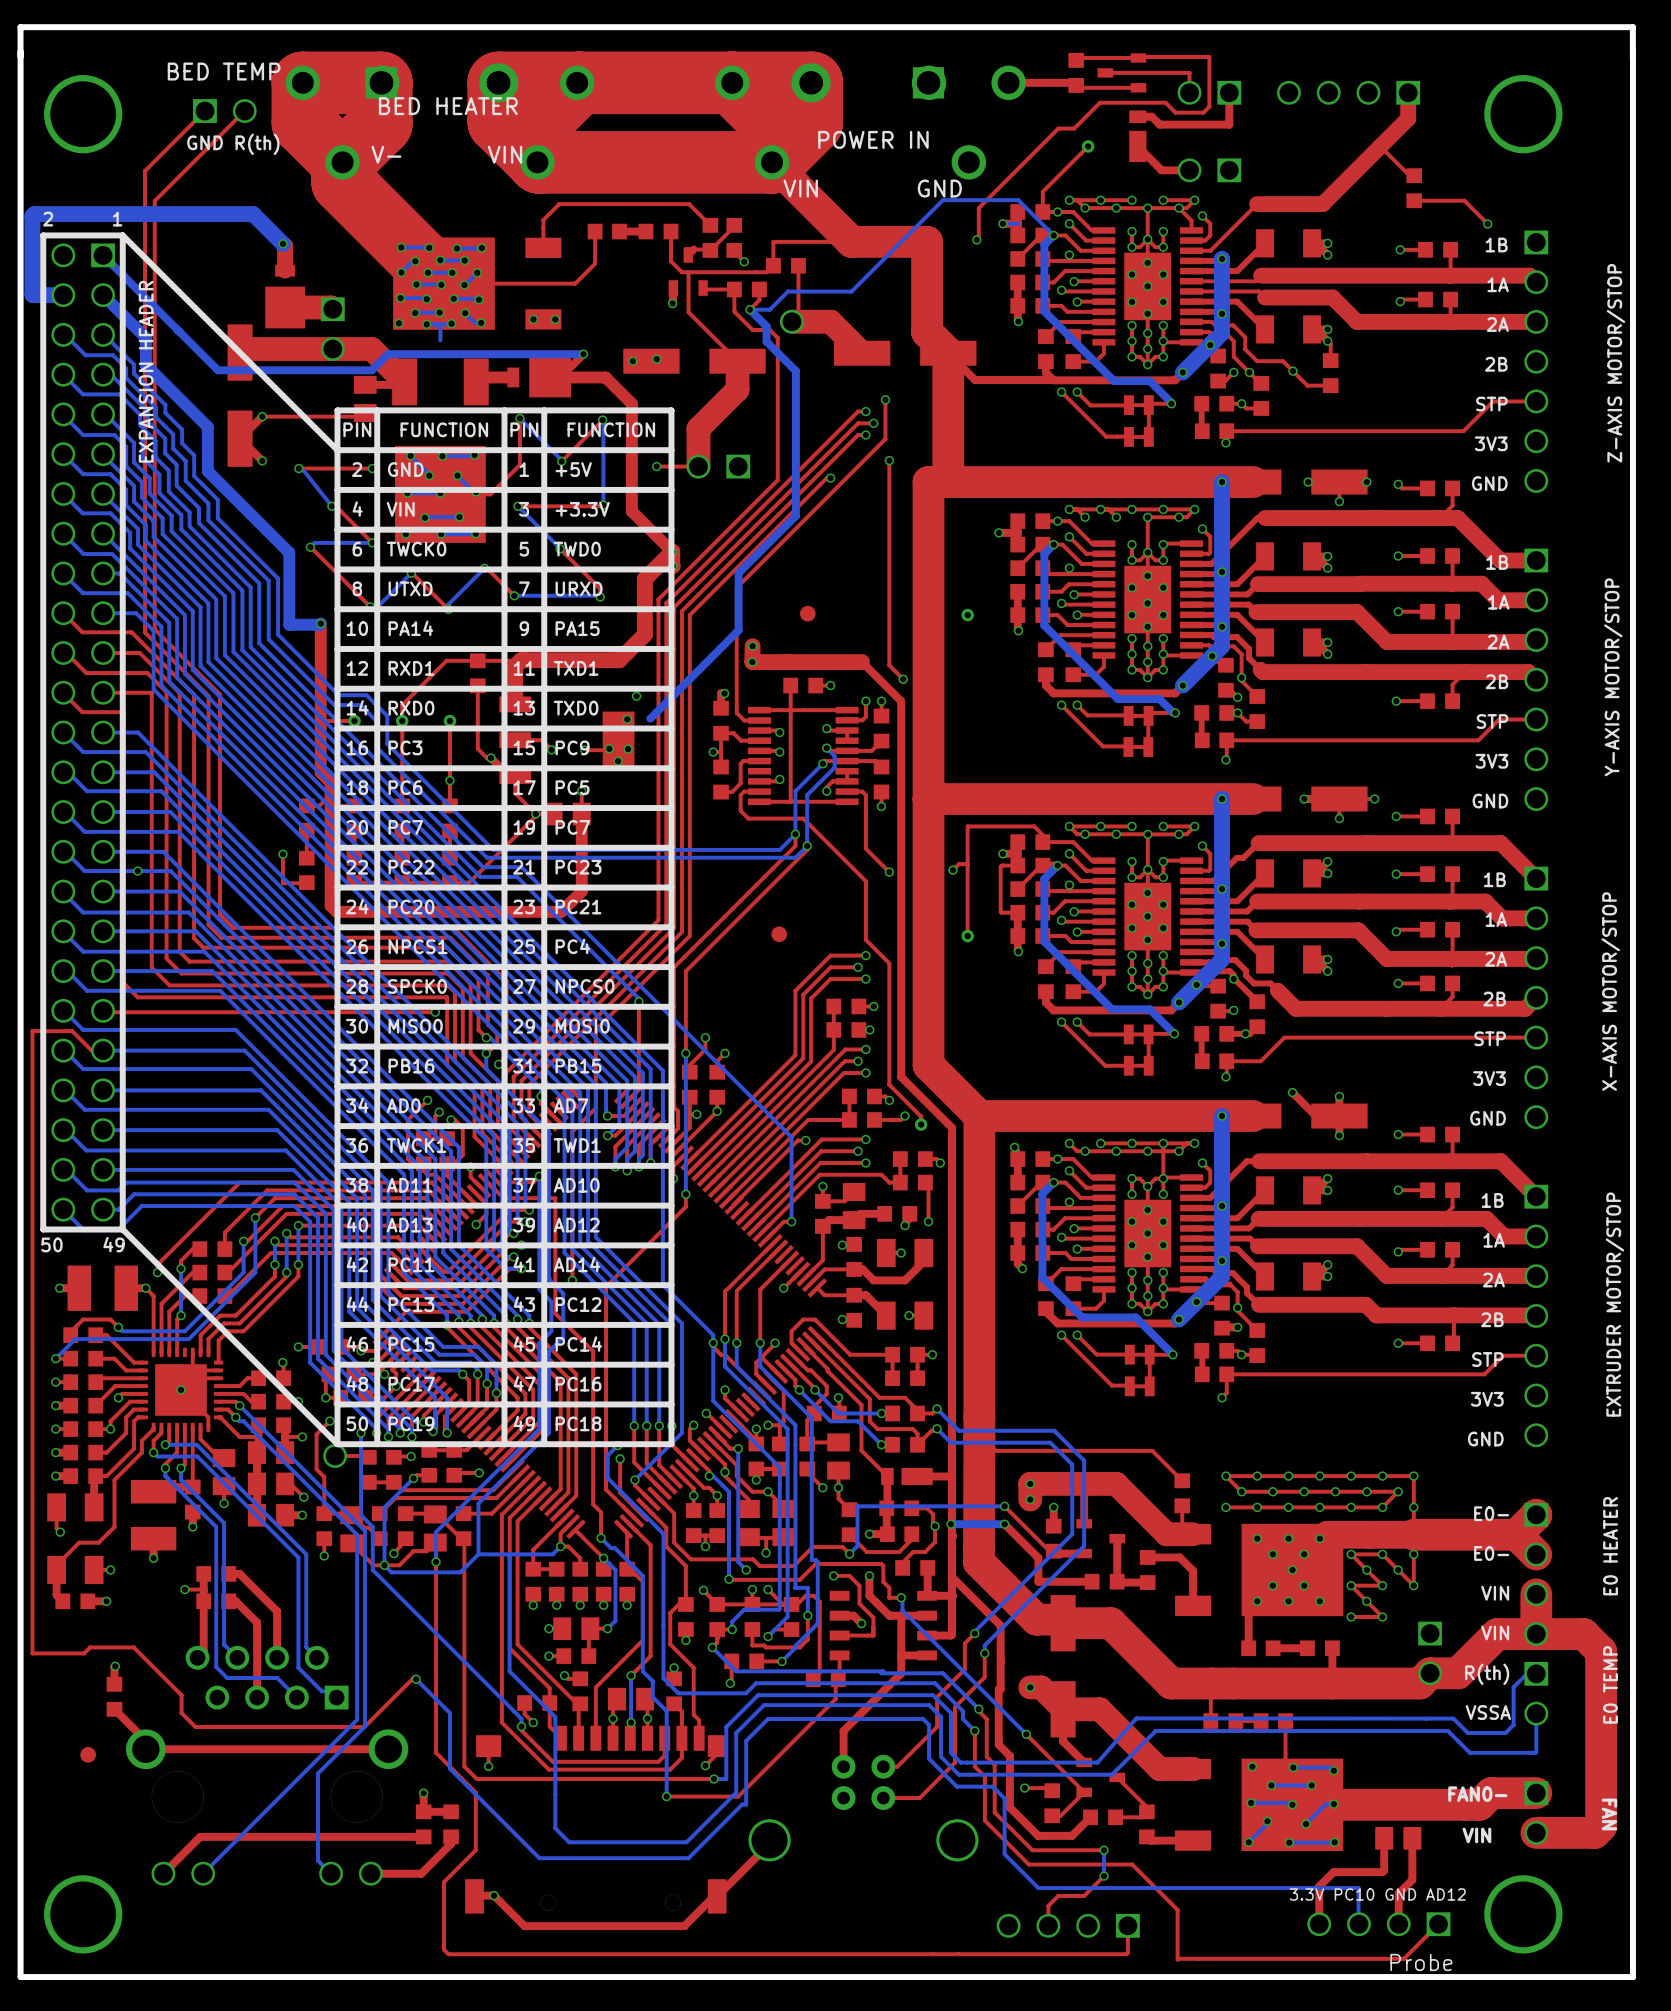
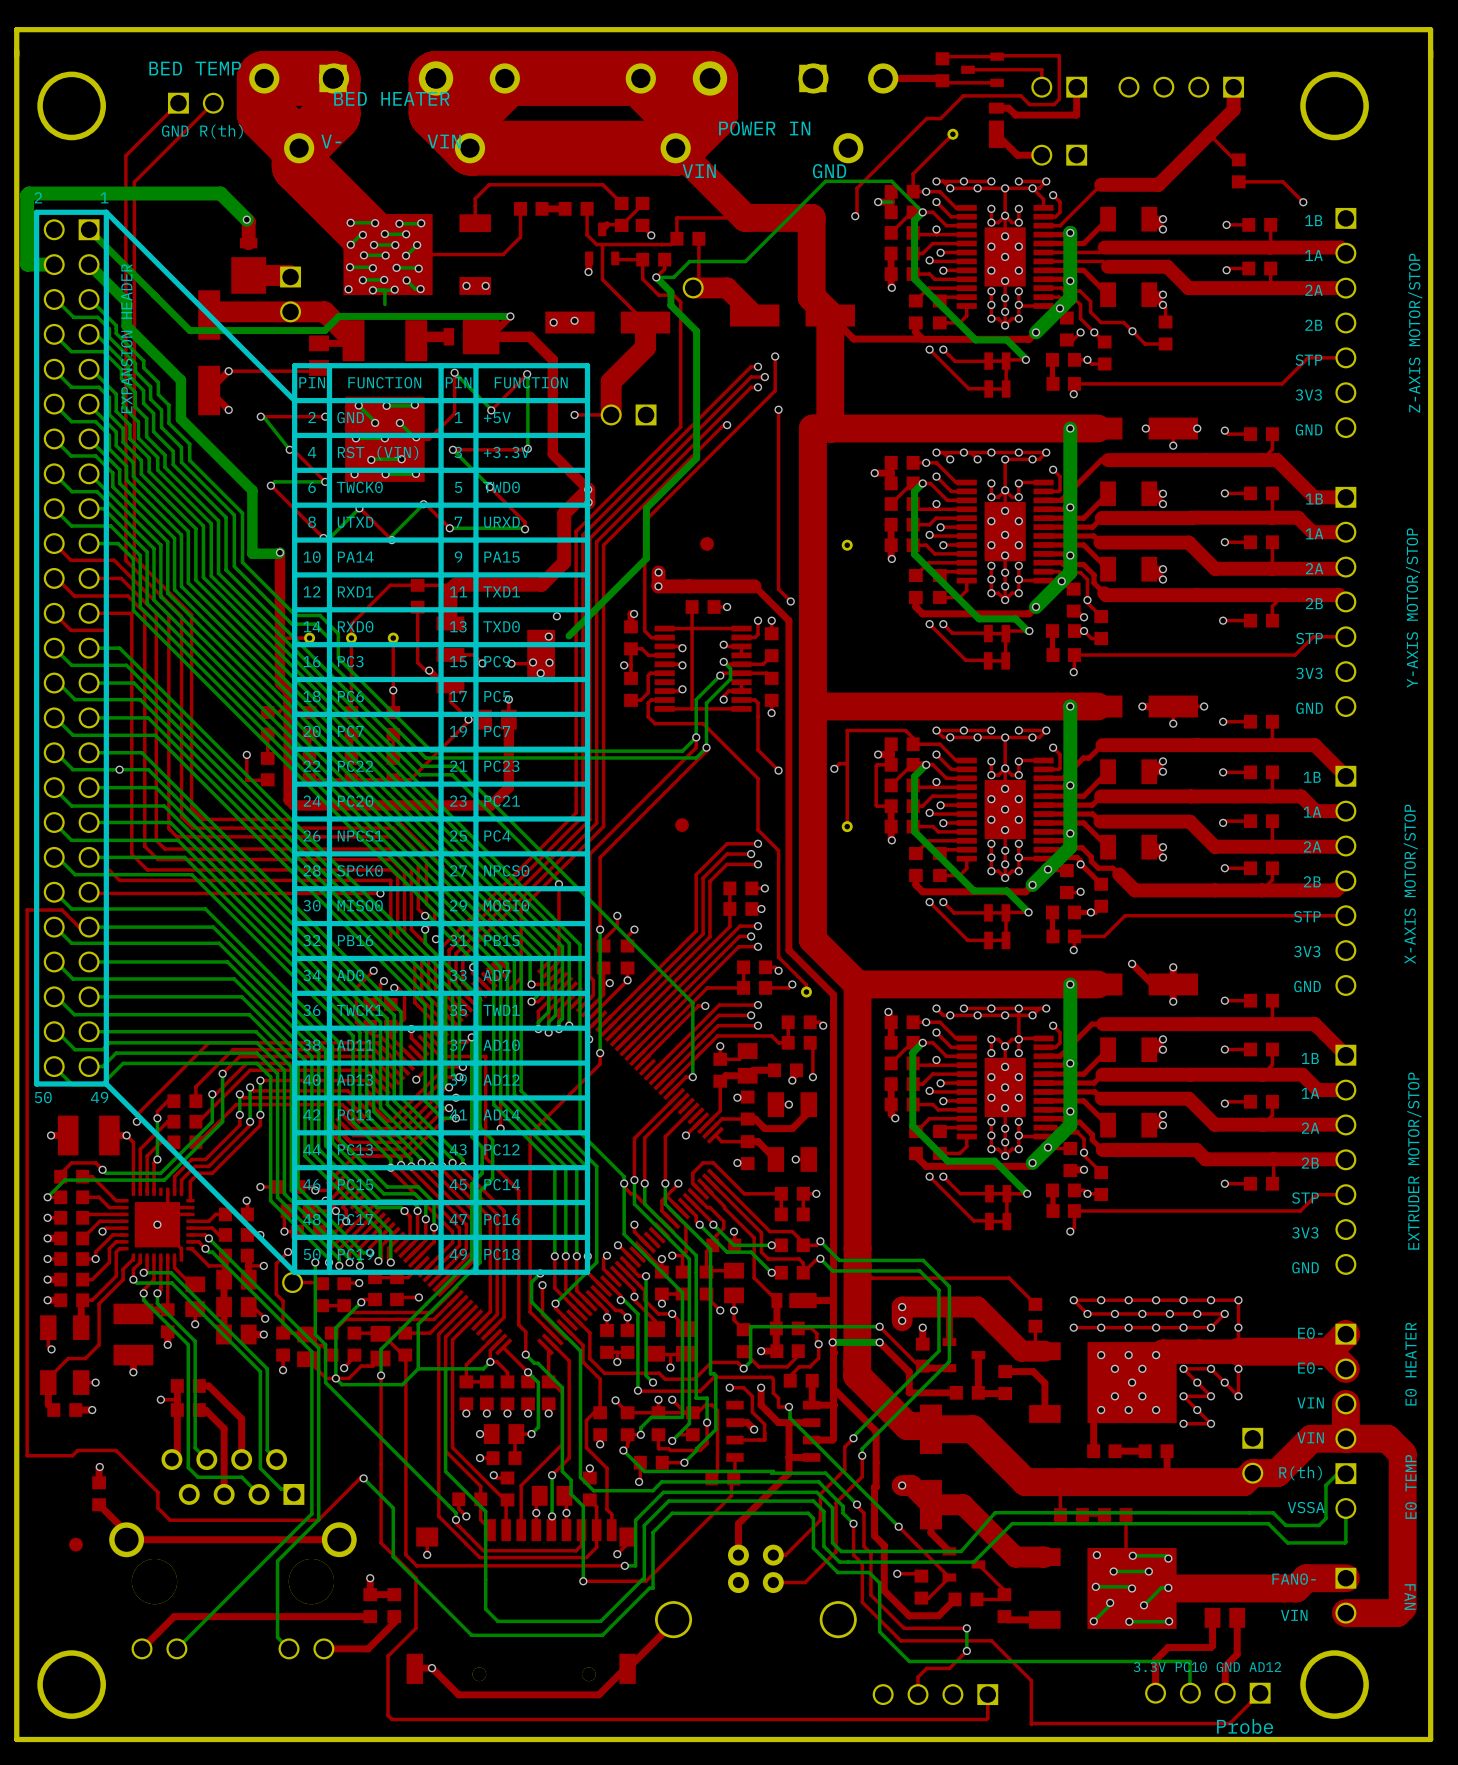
text: VIN (400, 509) -> RST (VIN) (378, 453)

